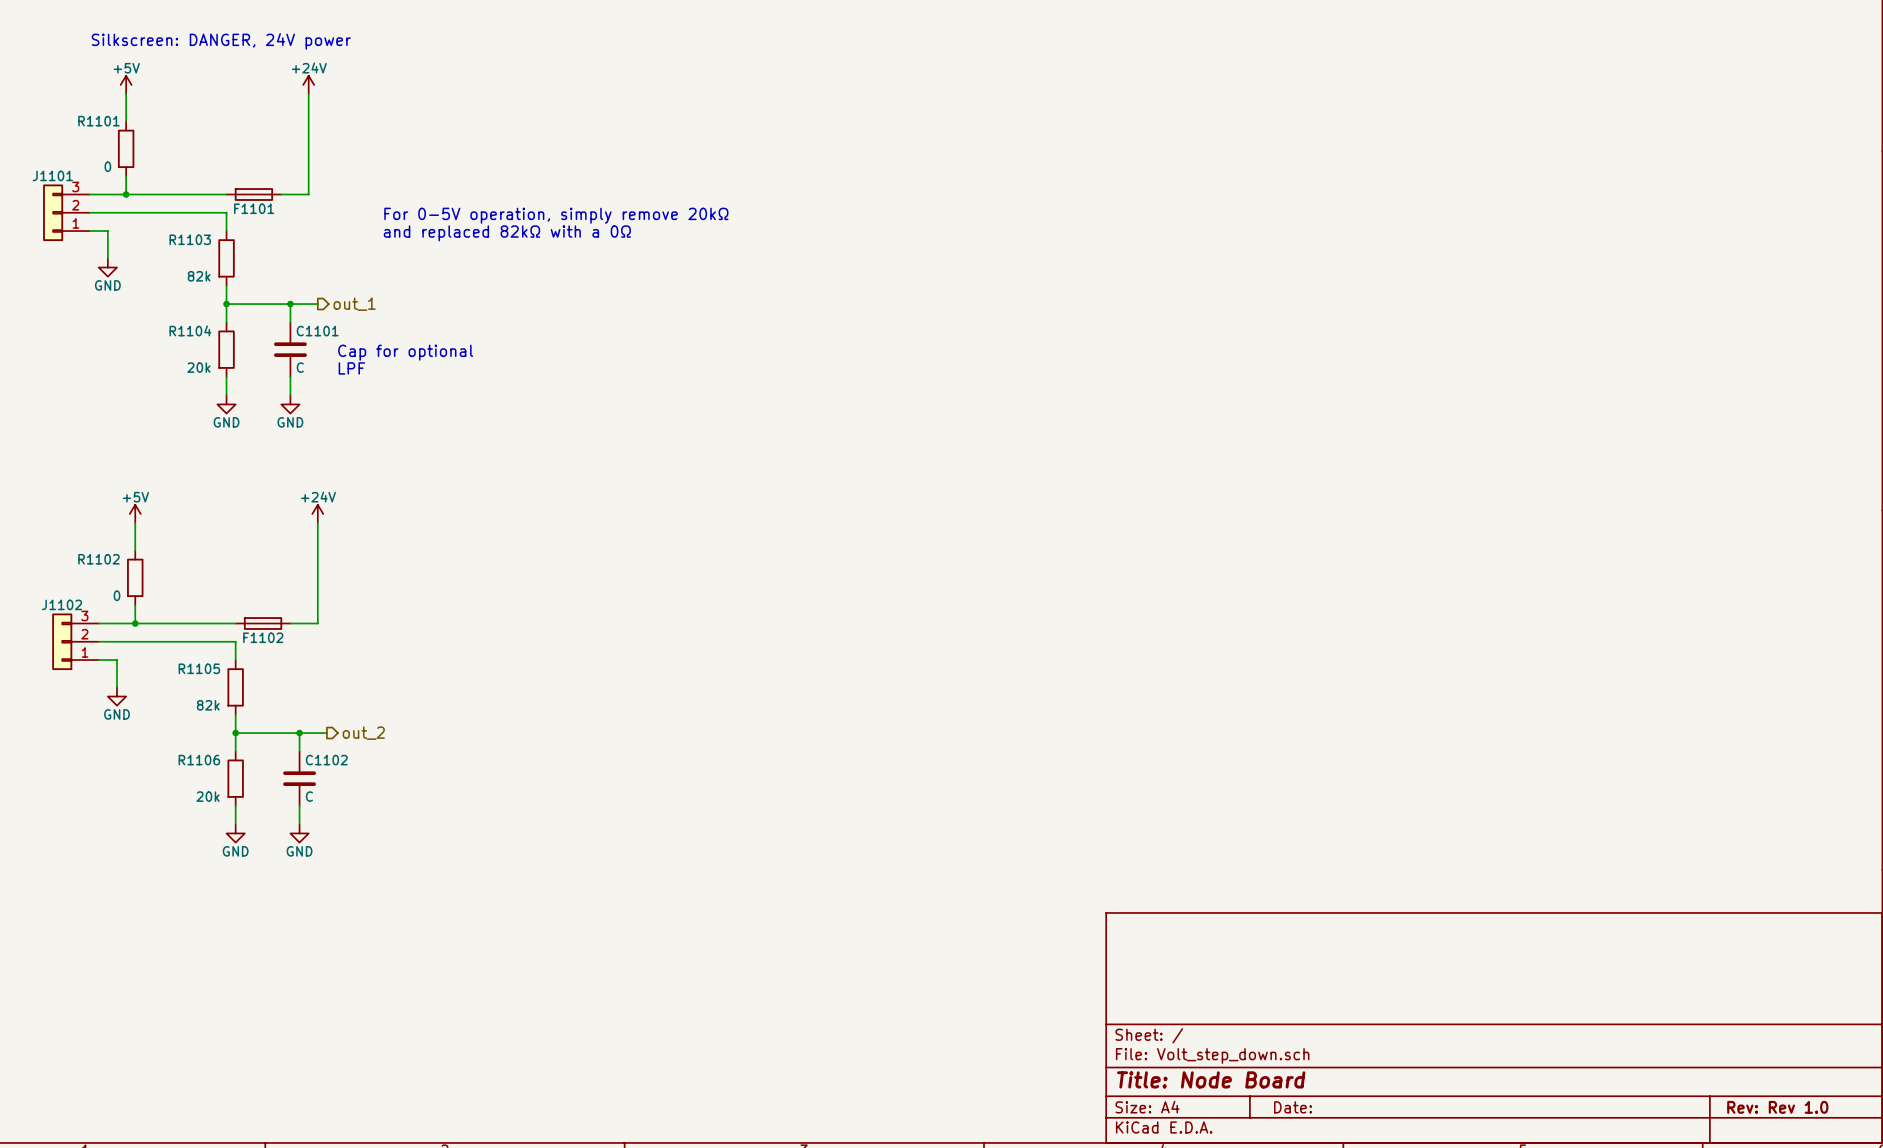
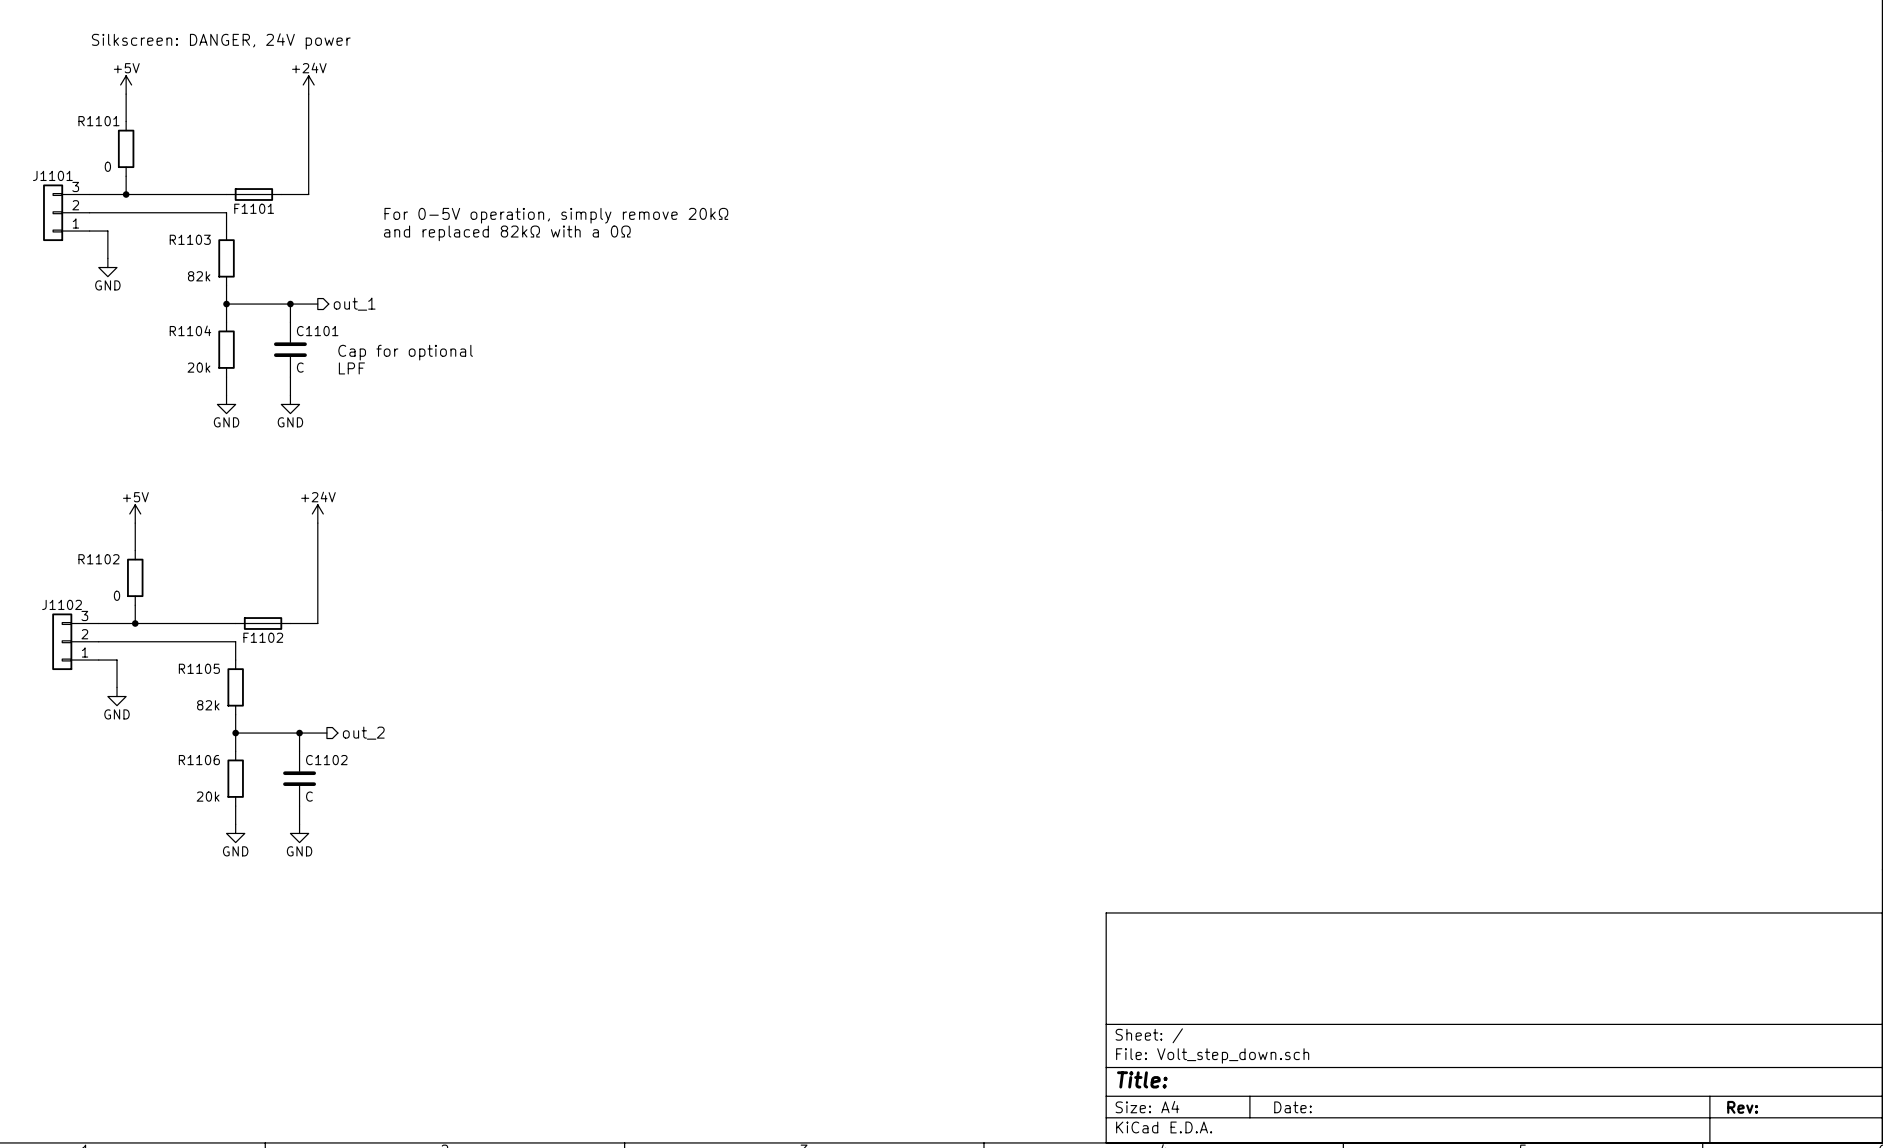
title block: Title: Node Board (1211, 1079) -> Title: (1142, 1079)
title block: Rev: Rev 1.0 (1777, 1107) -> Rev: (1742, 1107)

